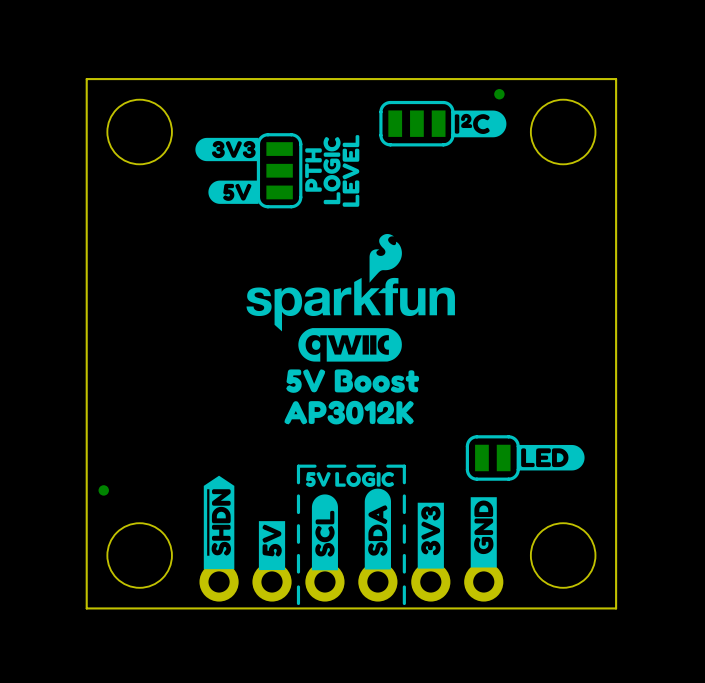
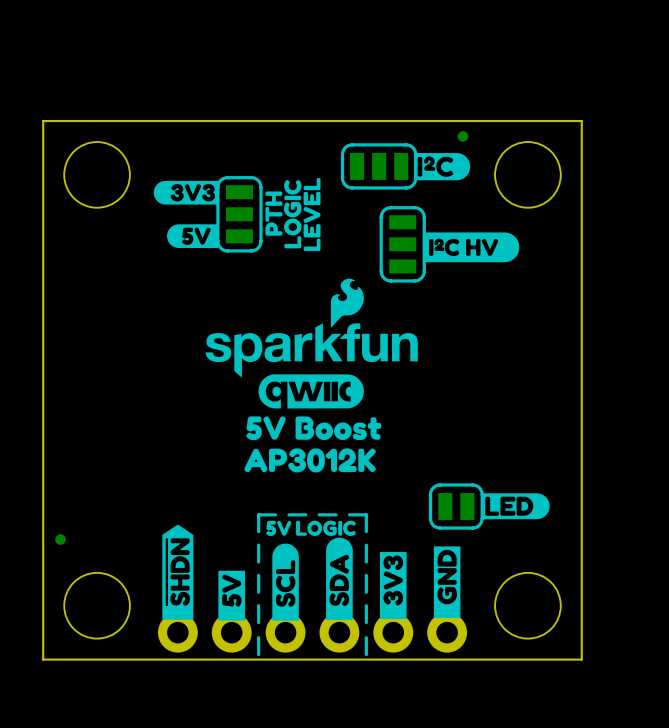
drawing: none -> [422, 232, 520, 263]
part: none -> (402, 244)

